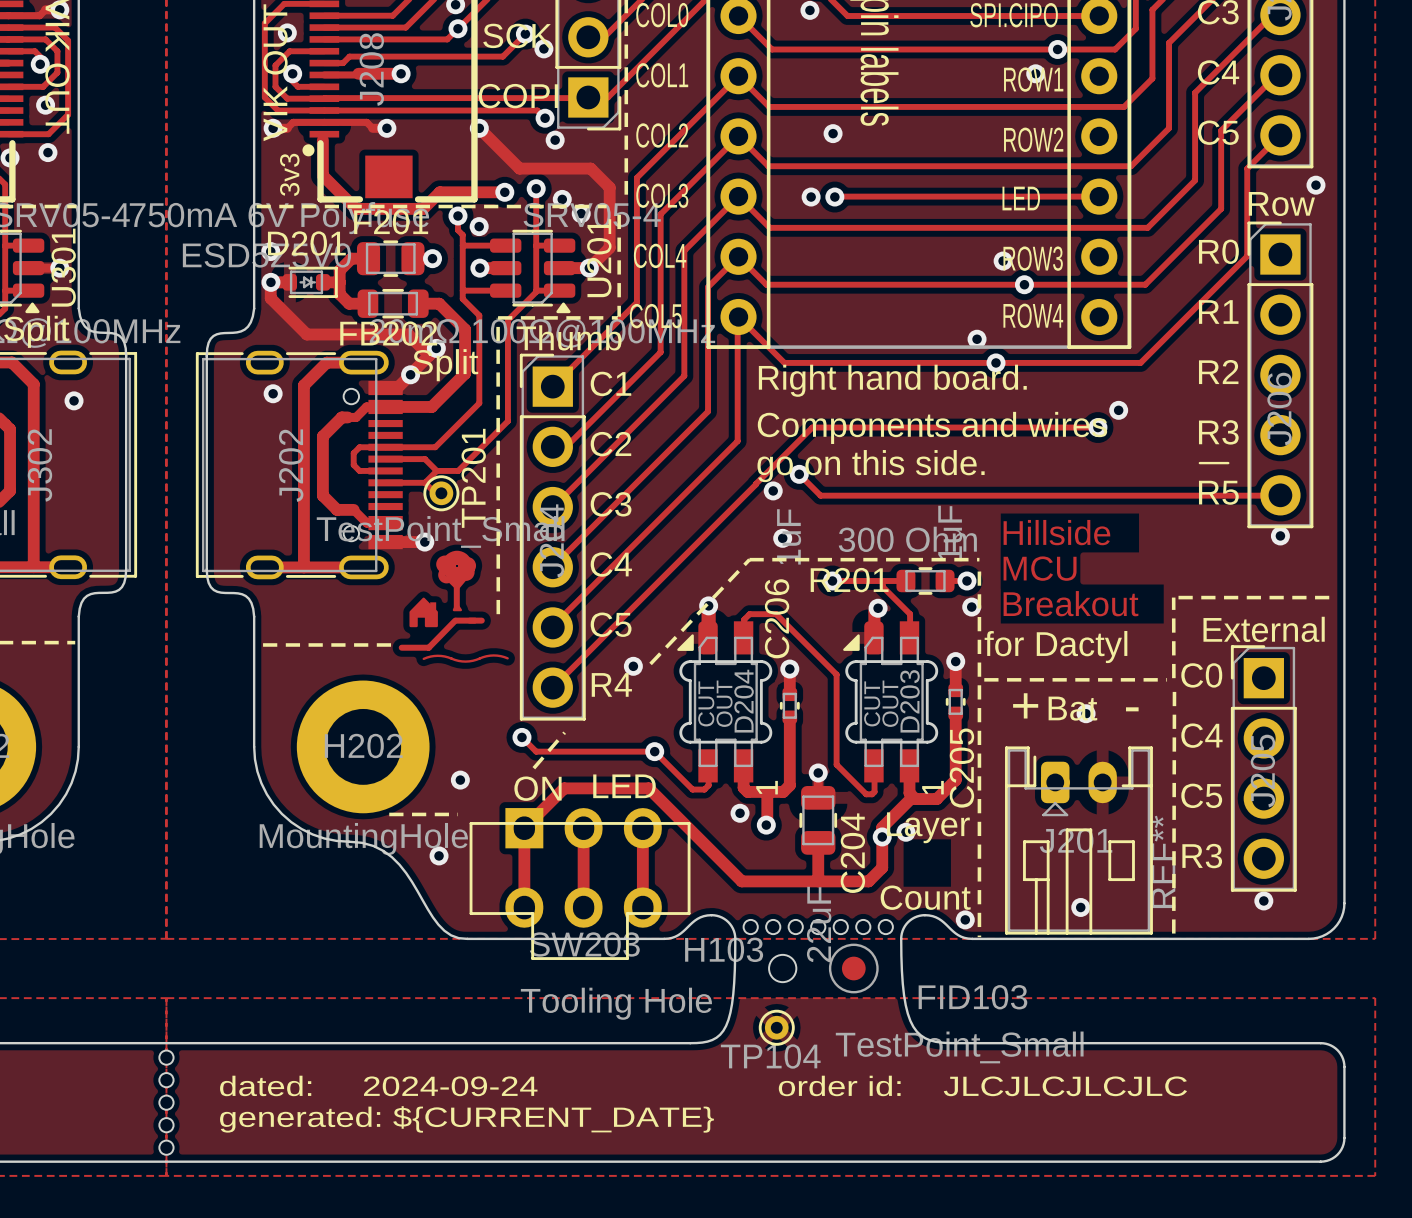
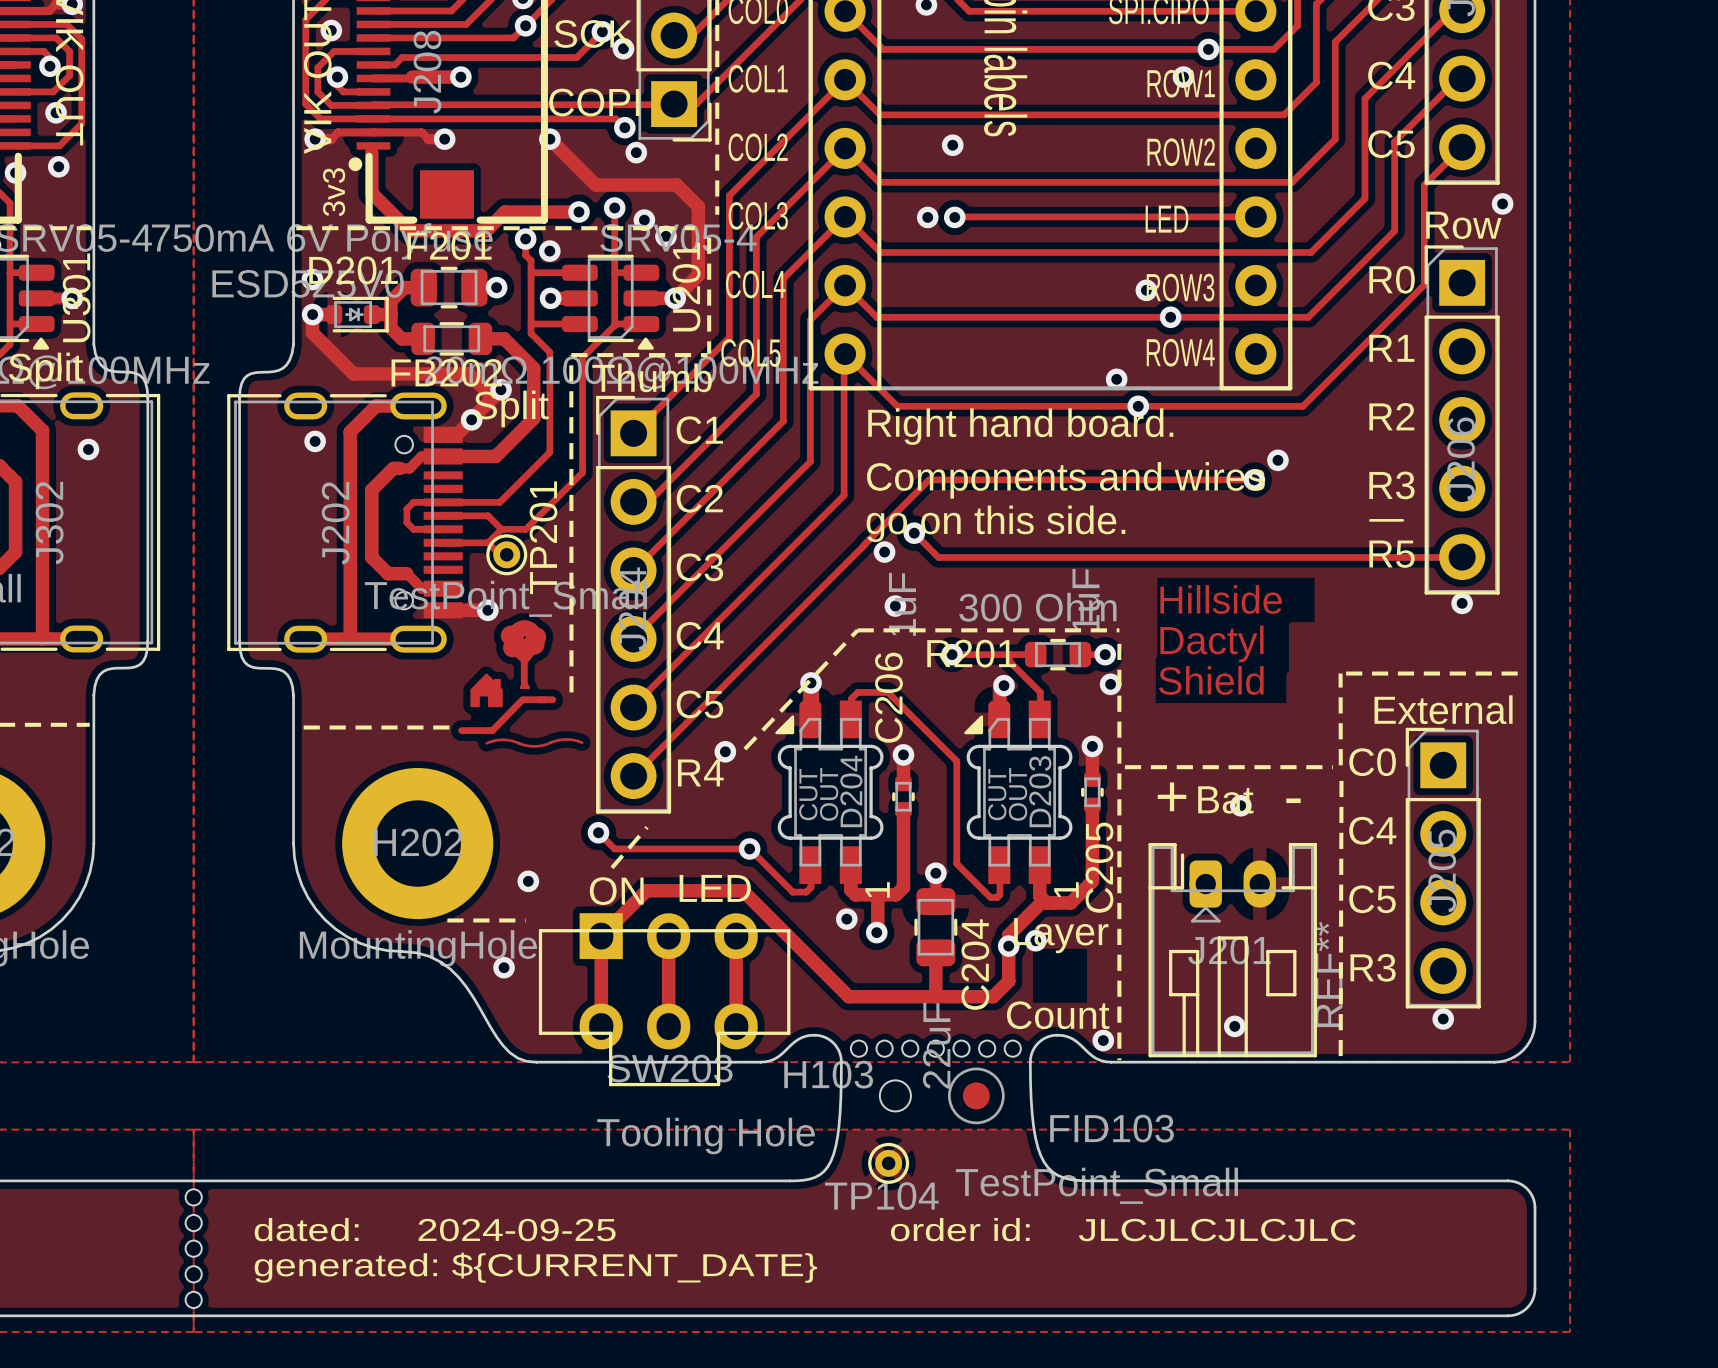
drawing shape: [1003, 519, 1139, 617] -> [1158, 585, 1282, 695]
text: for Dactyl (1056, 647) -> none
text: dated: 2024-09-24 (378, 1085) -> dated: 2024-09-25 (435, 1229)

